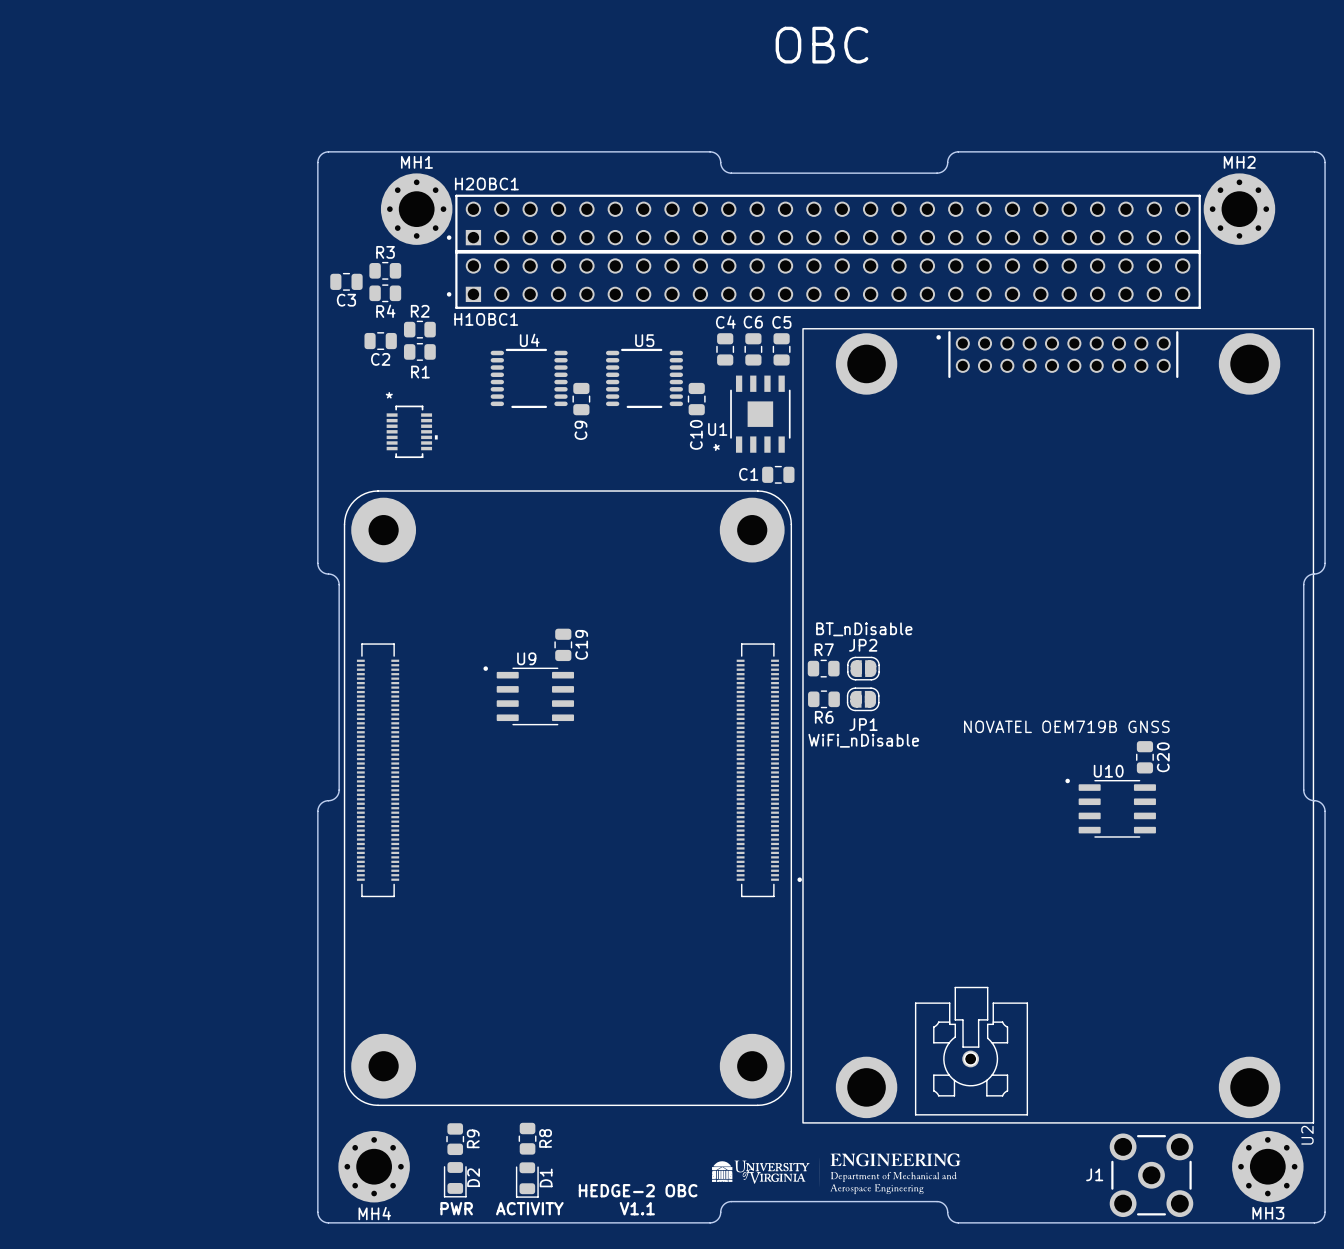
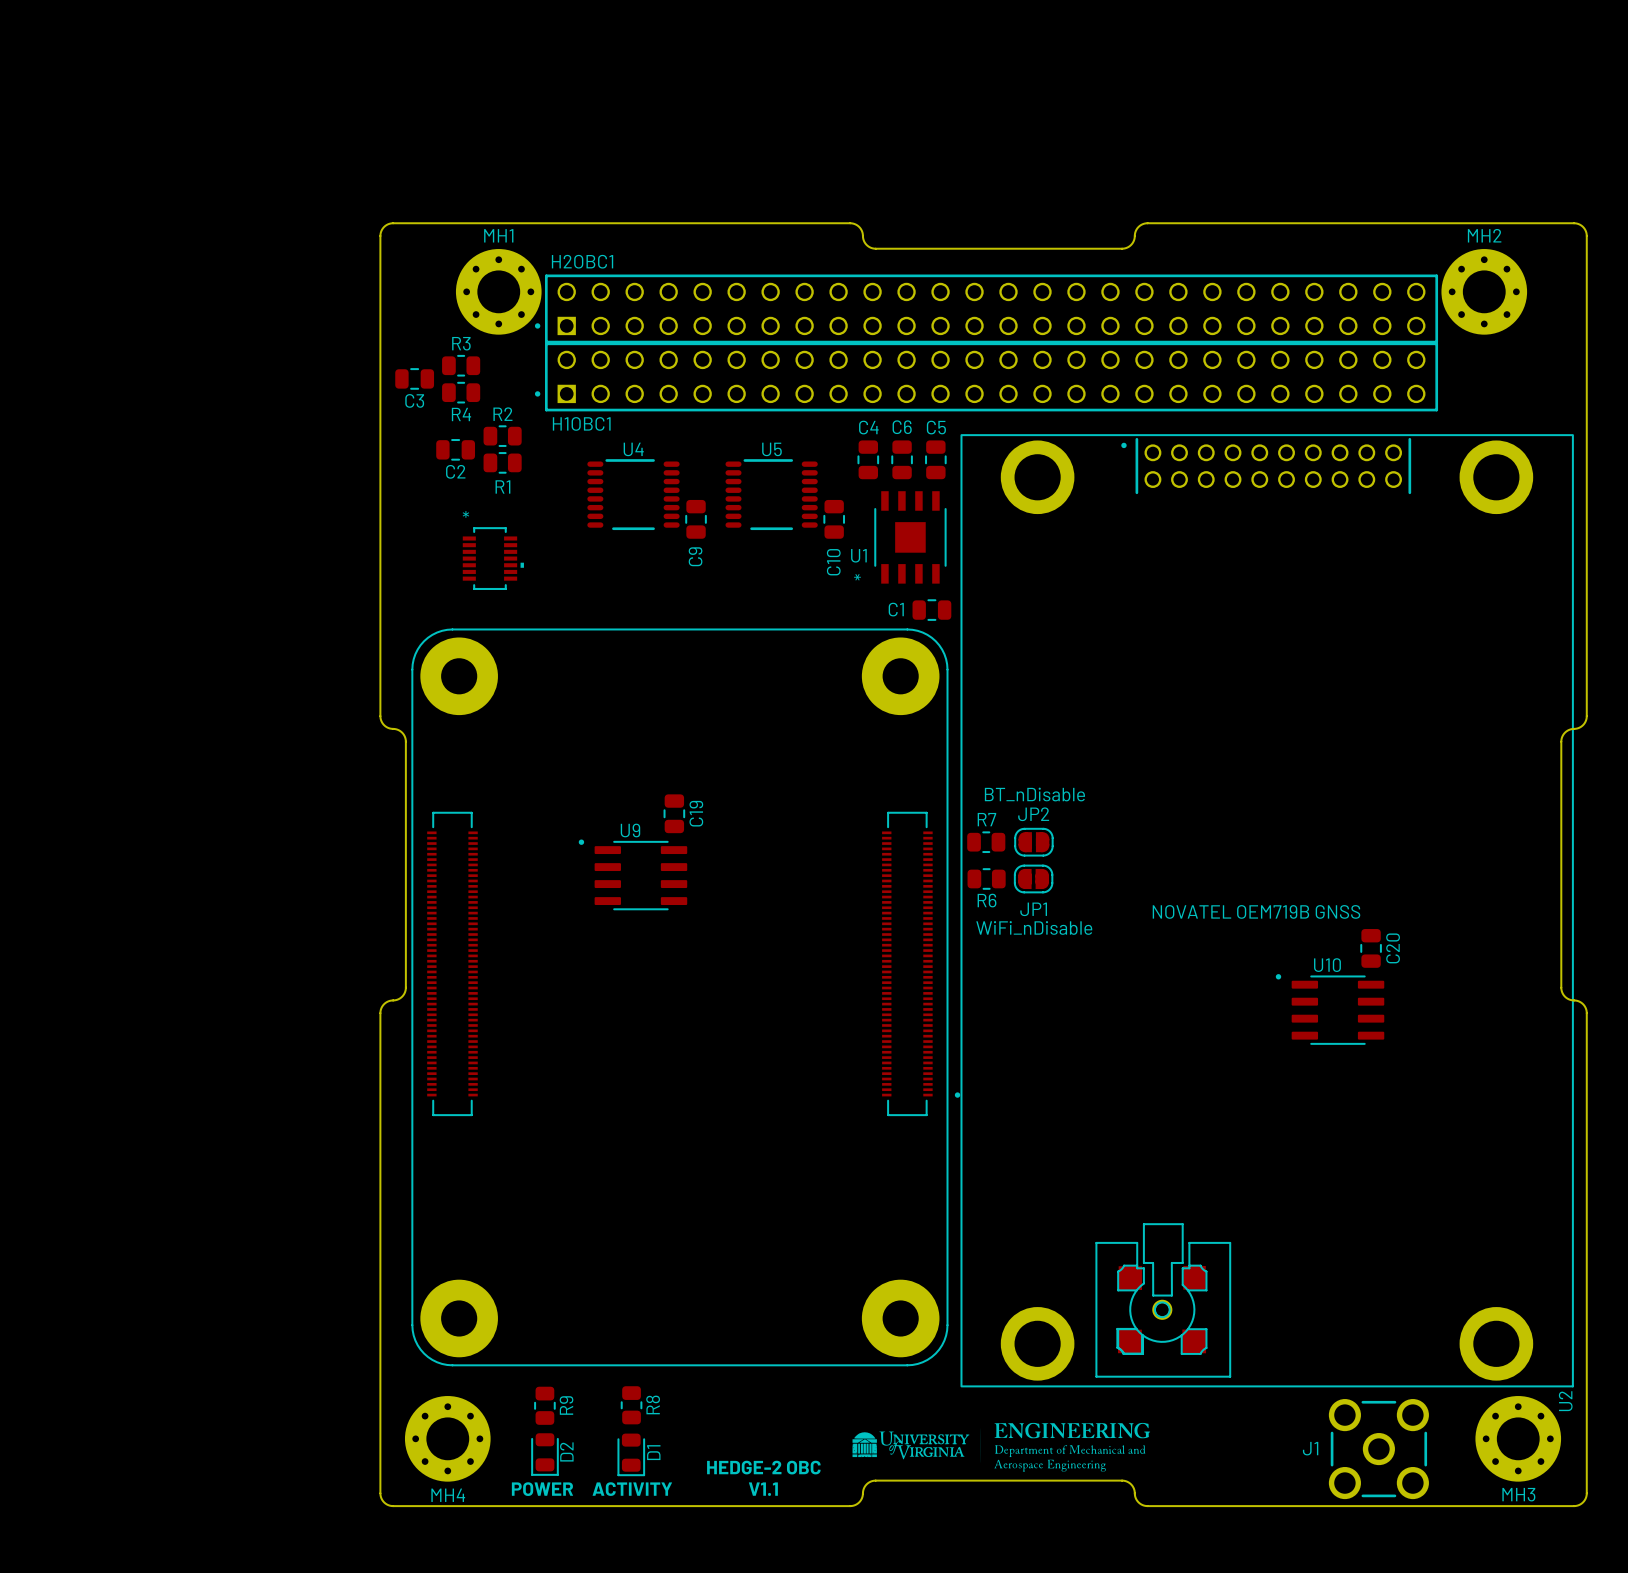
text: OBC (821, 45) -> none
U2 footprint: [802, 328, 1315, 1124] -> [960, 434, 1574, 1388]
text: PWR (456, 1208) -> POWER (542, 1489)

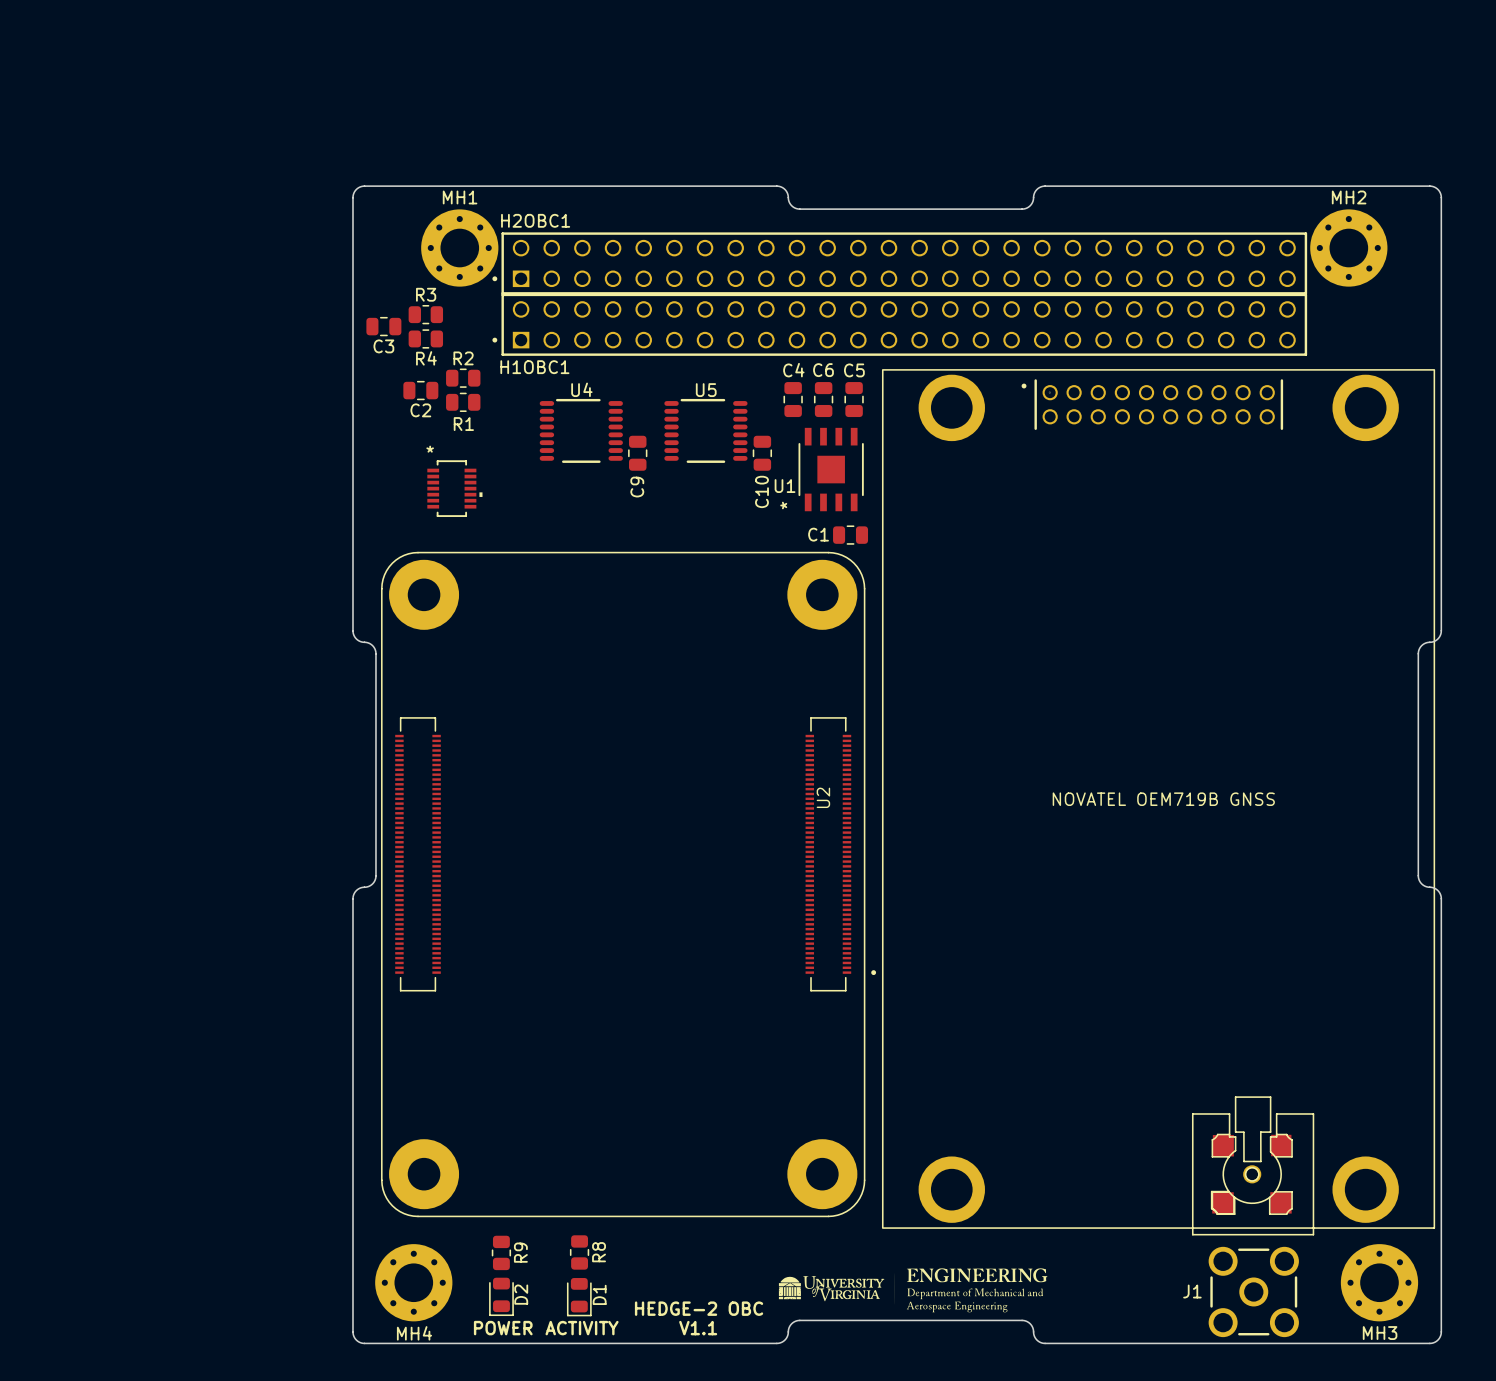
U2 footprint: [960, 434, 1574, 1388] -> [882, 369, 1435, 1236]
C19: (674, 813) -> none
R7: (986, 842) -> none
JP2: BT_nDisable (1033, 842) -> none
U9: (632, 874) -> none
R6: (986, 878) -> none
JP1: WiFi_nDisable (1033, 878) -> none
C20: (1371, 948) -> none
U10: (1330, 1009) -> none
U2 name position: U2 (1565, 1401) -> U2 (823, 797)

